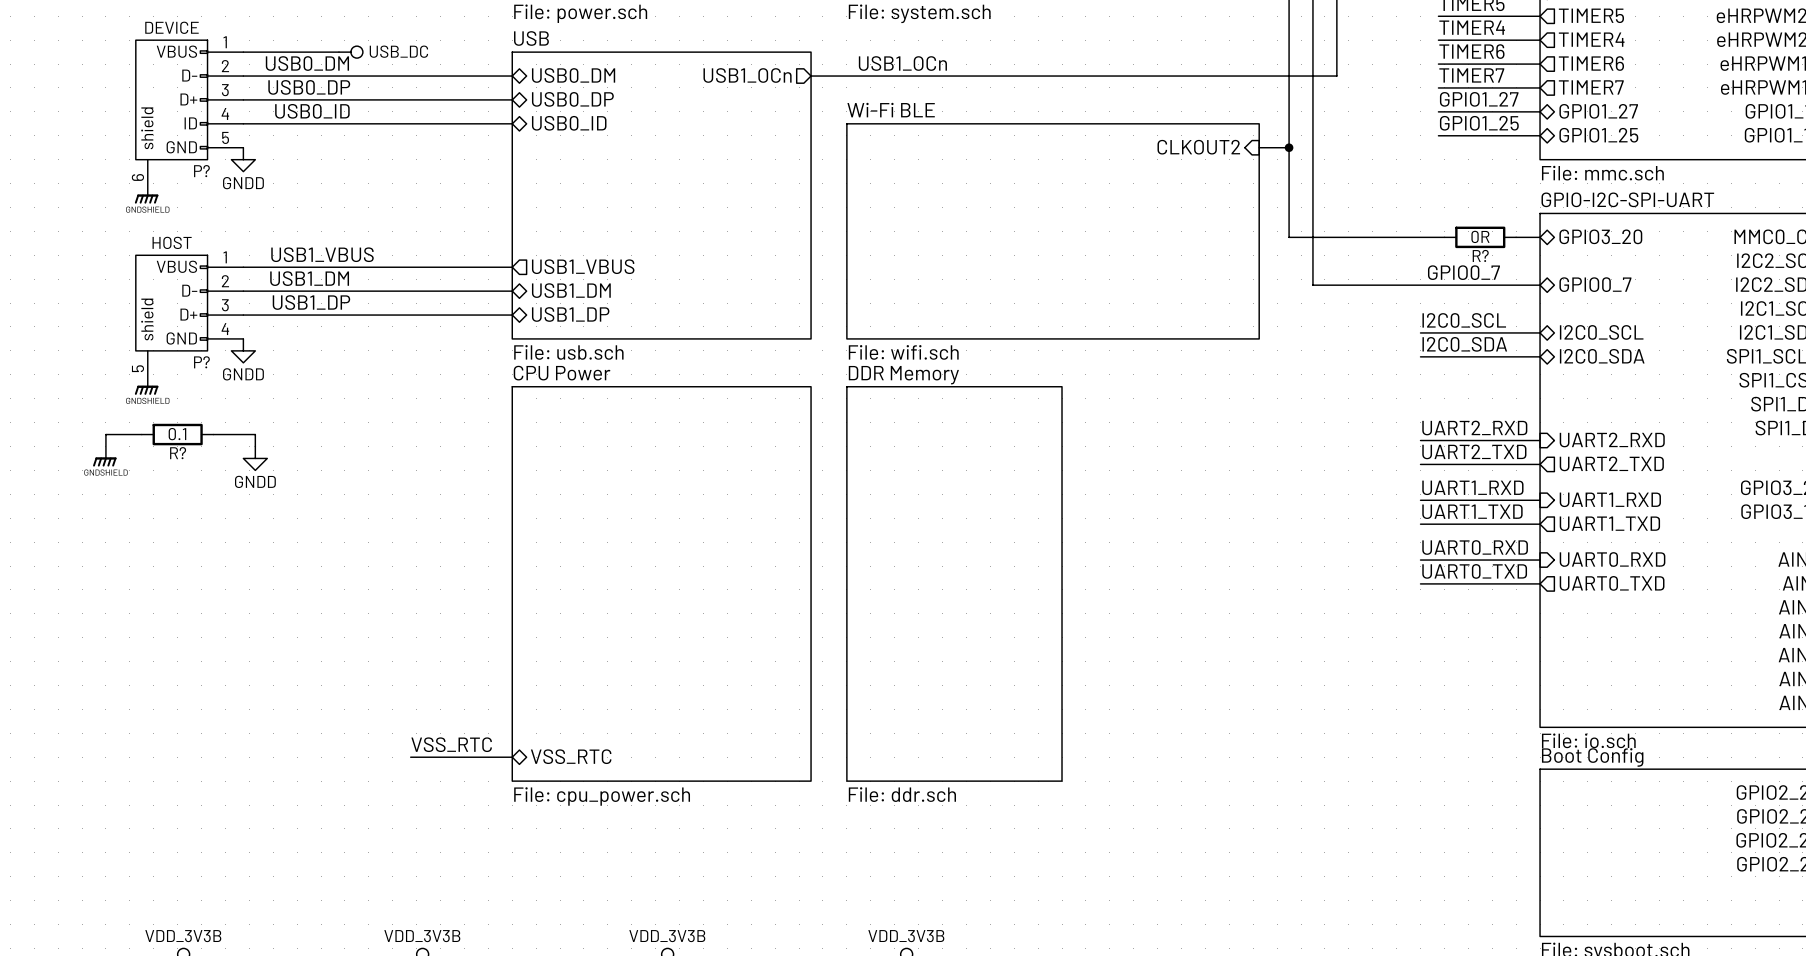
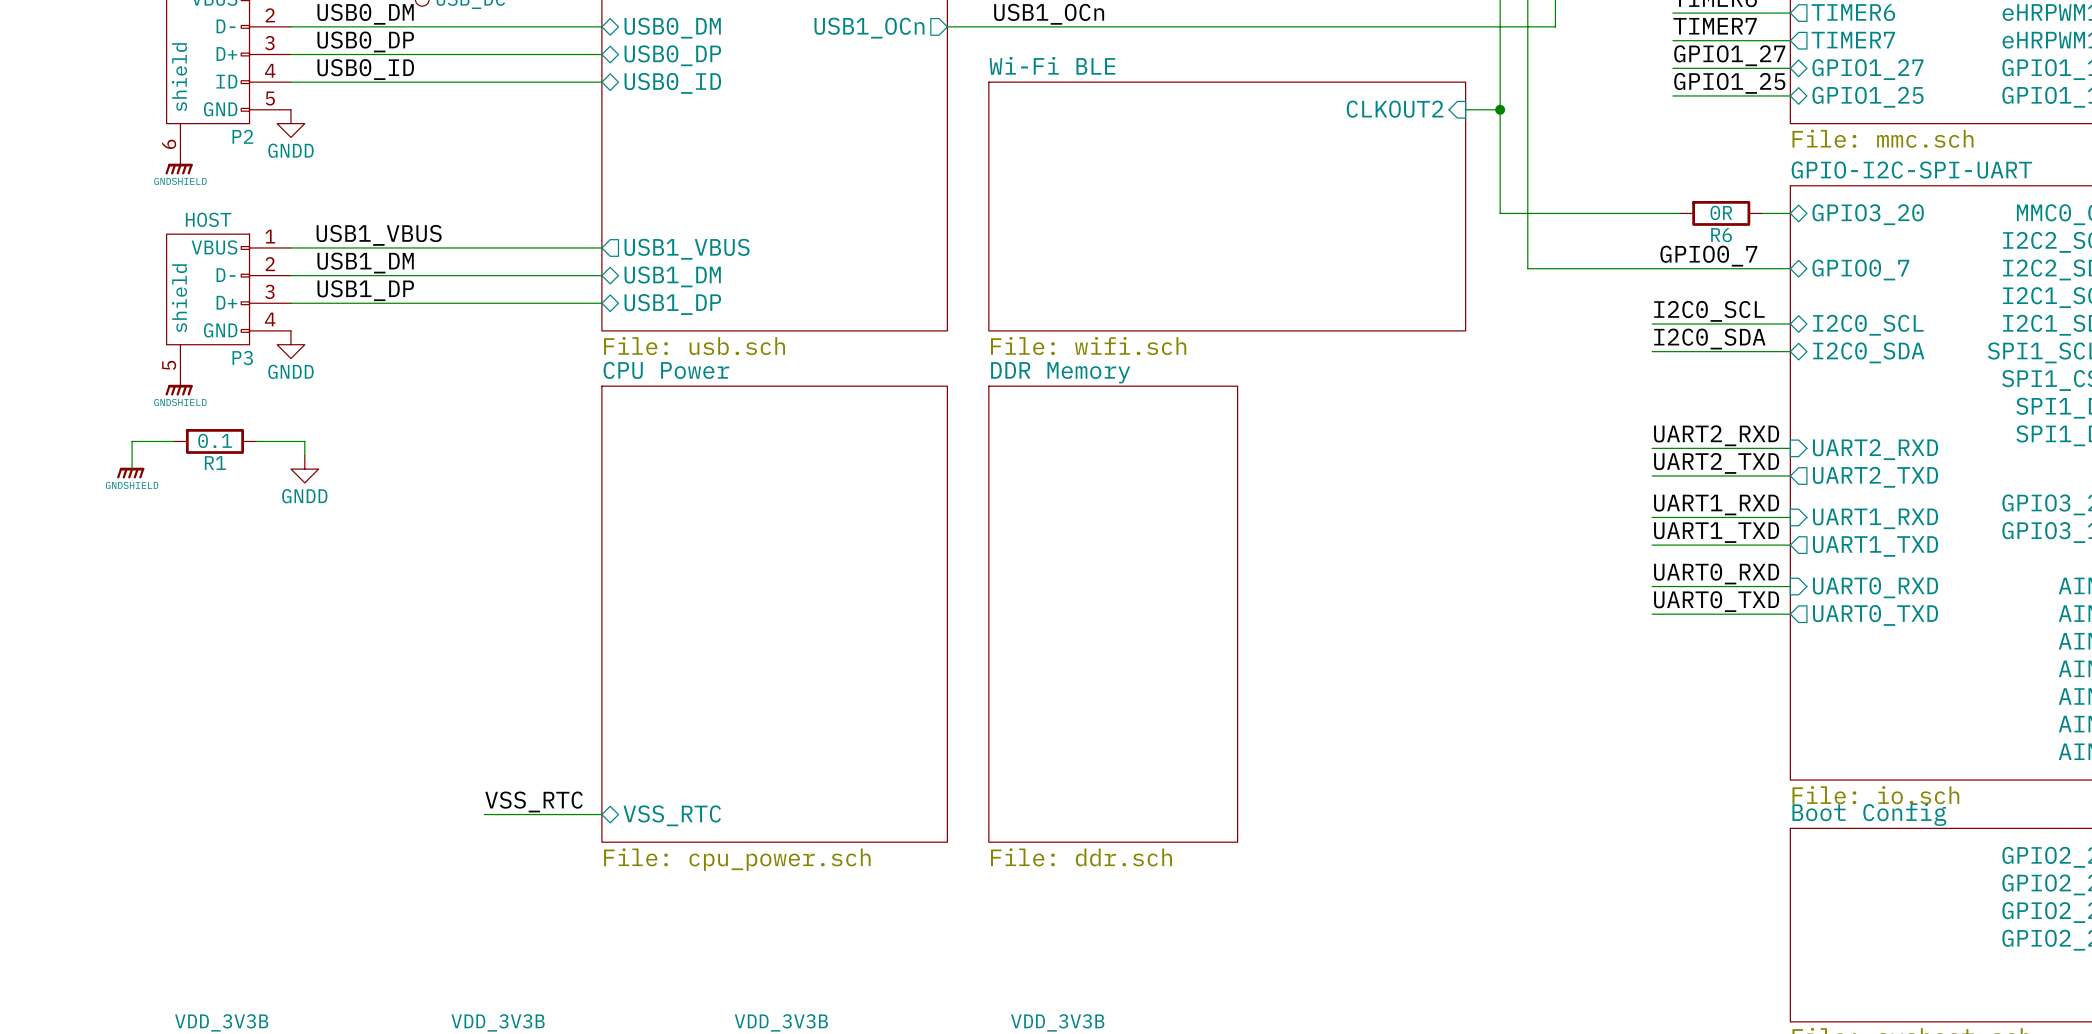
P? name: P? (201, 171) -> P2 (242, 136)
R? name: R? (1480, 255) -> R6 (1721, 235)
P? name: P? (201, 362) -> P3 (242, 358)
R? name: R? (178, 453) -> R1 (215, 463)

